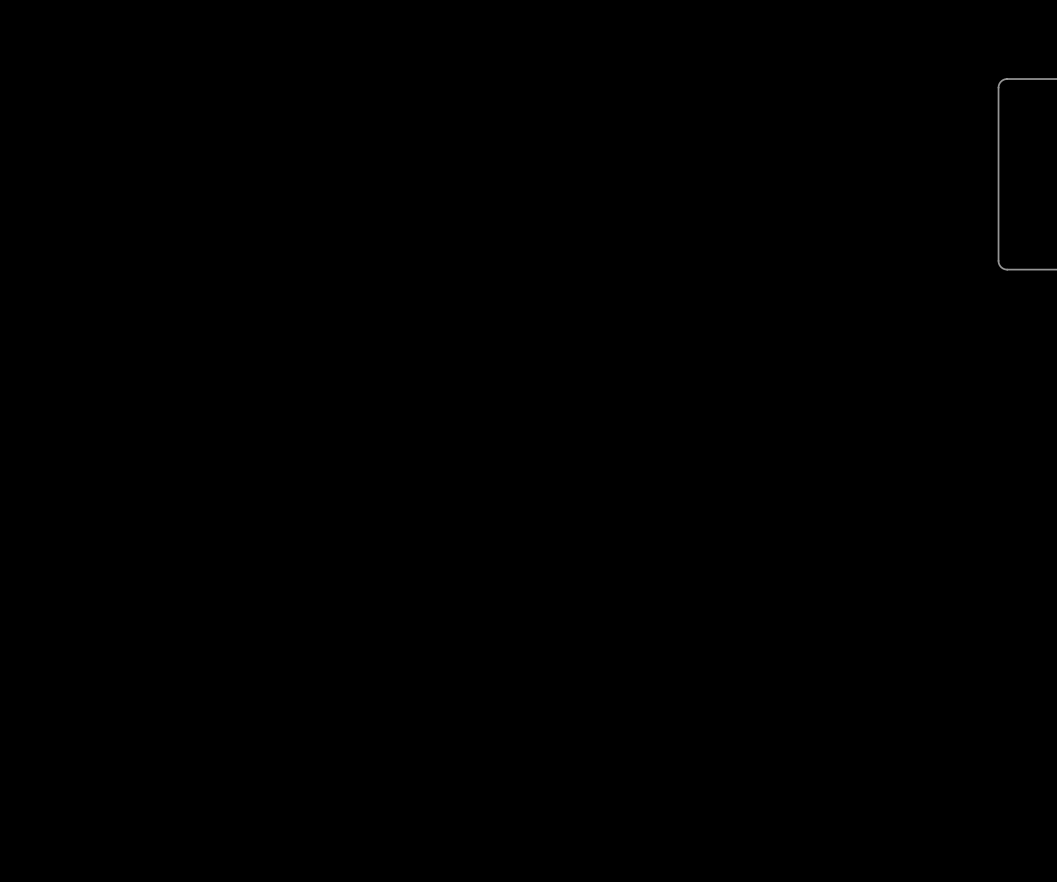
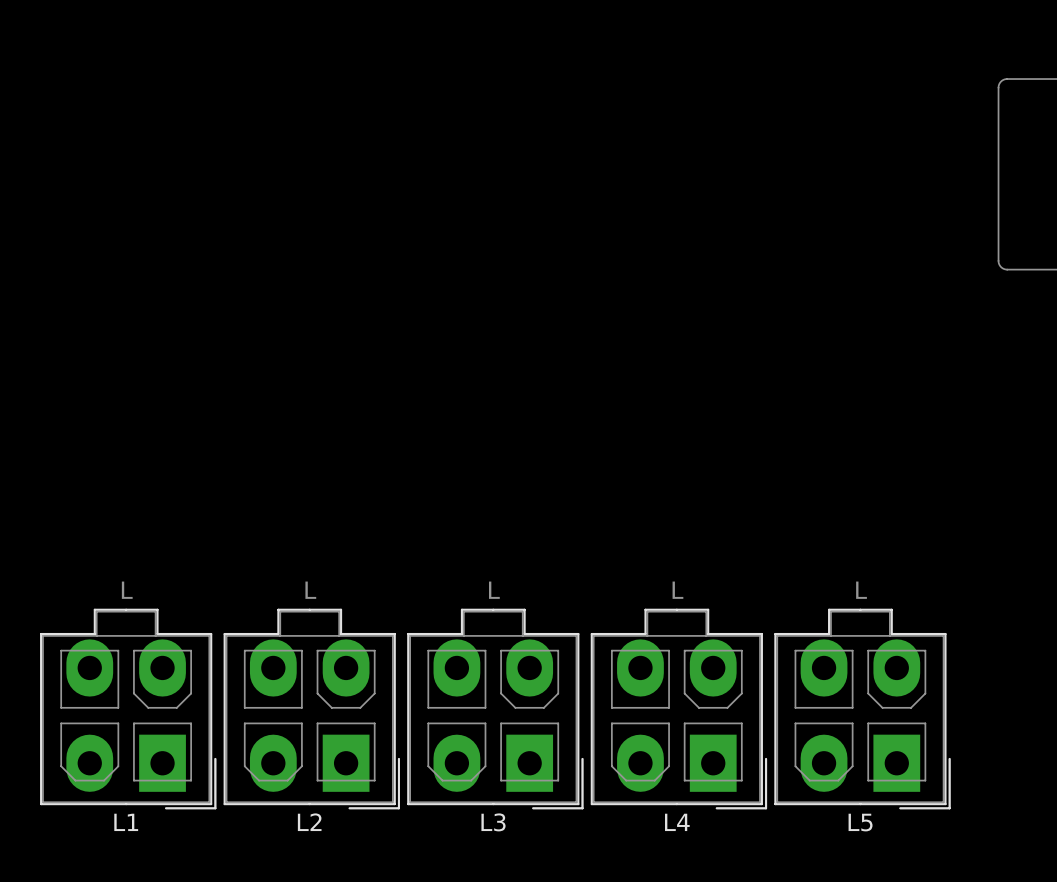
L1: none -> L (128, 709)
L2: none -> L (311, 709)
L3: none -> L (495, 709)
L4: none -> L (678, 709)
L5: none -> L (862, 709)

